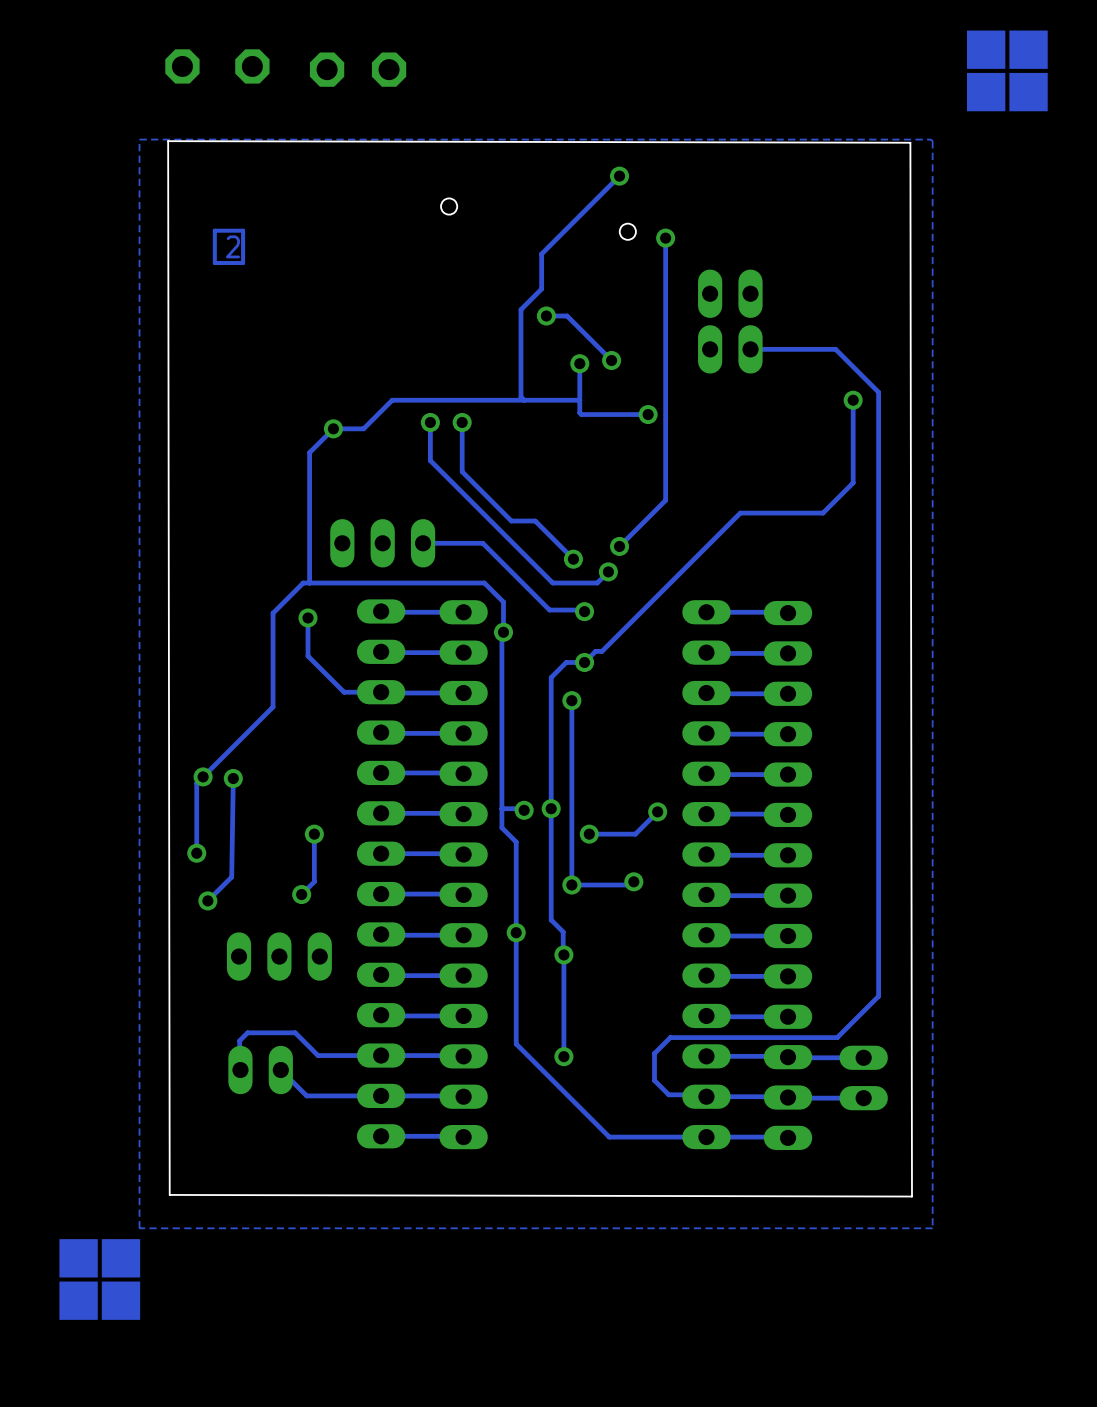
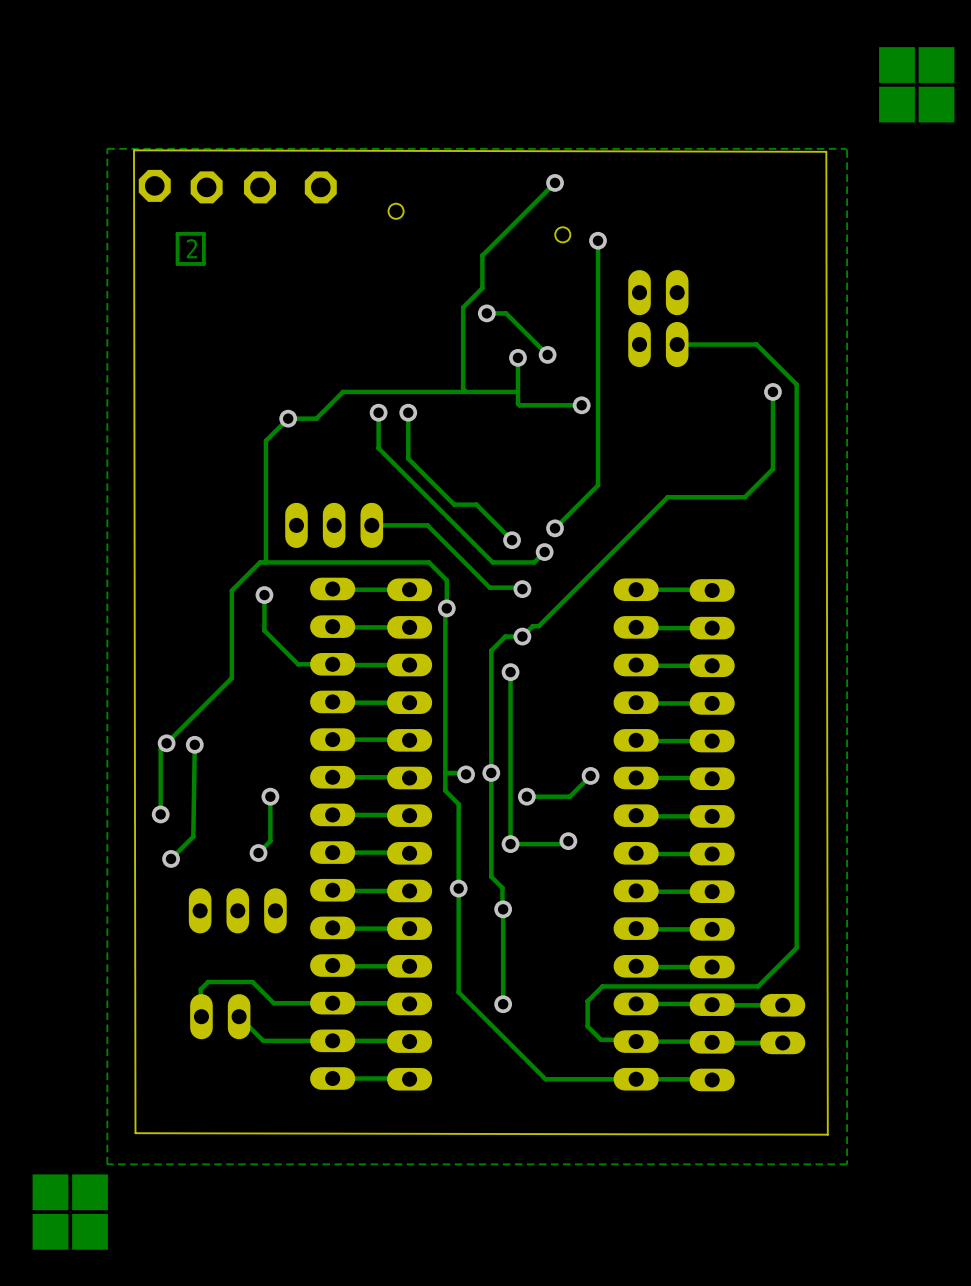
part: (182, 66) -> none
part: (252, 66) -> none
part: (327, 69) -> none
part: (389, 69) -> none
part: none -> (154, 185)
part: none -> (206, 187)
part: none -> (260, 187)
part: none -> (320, 187)

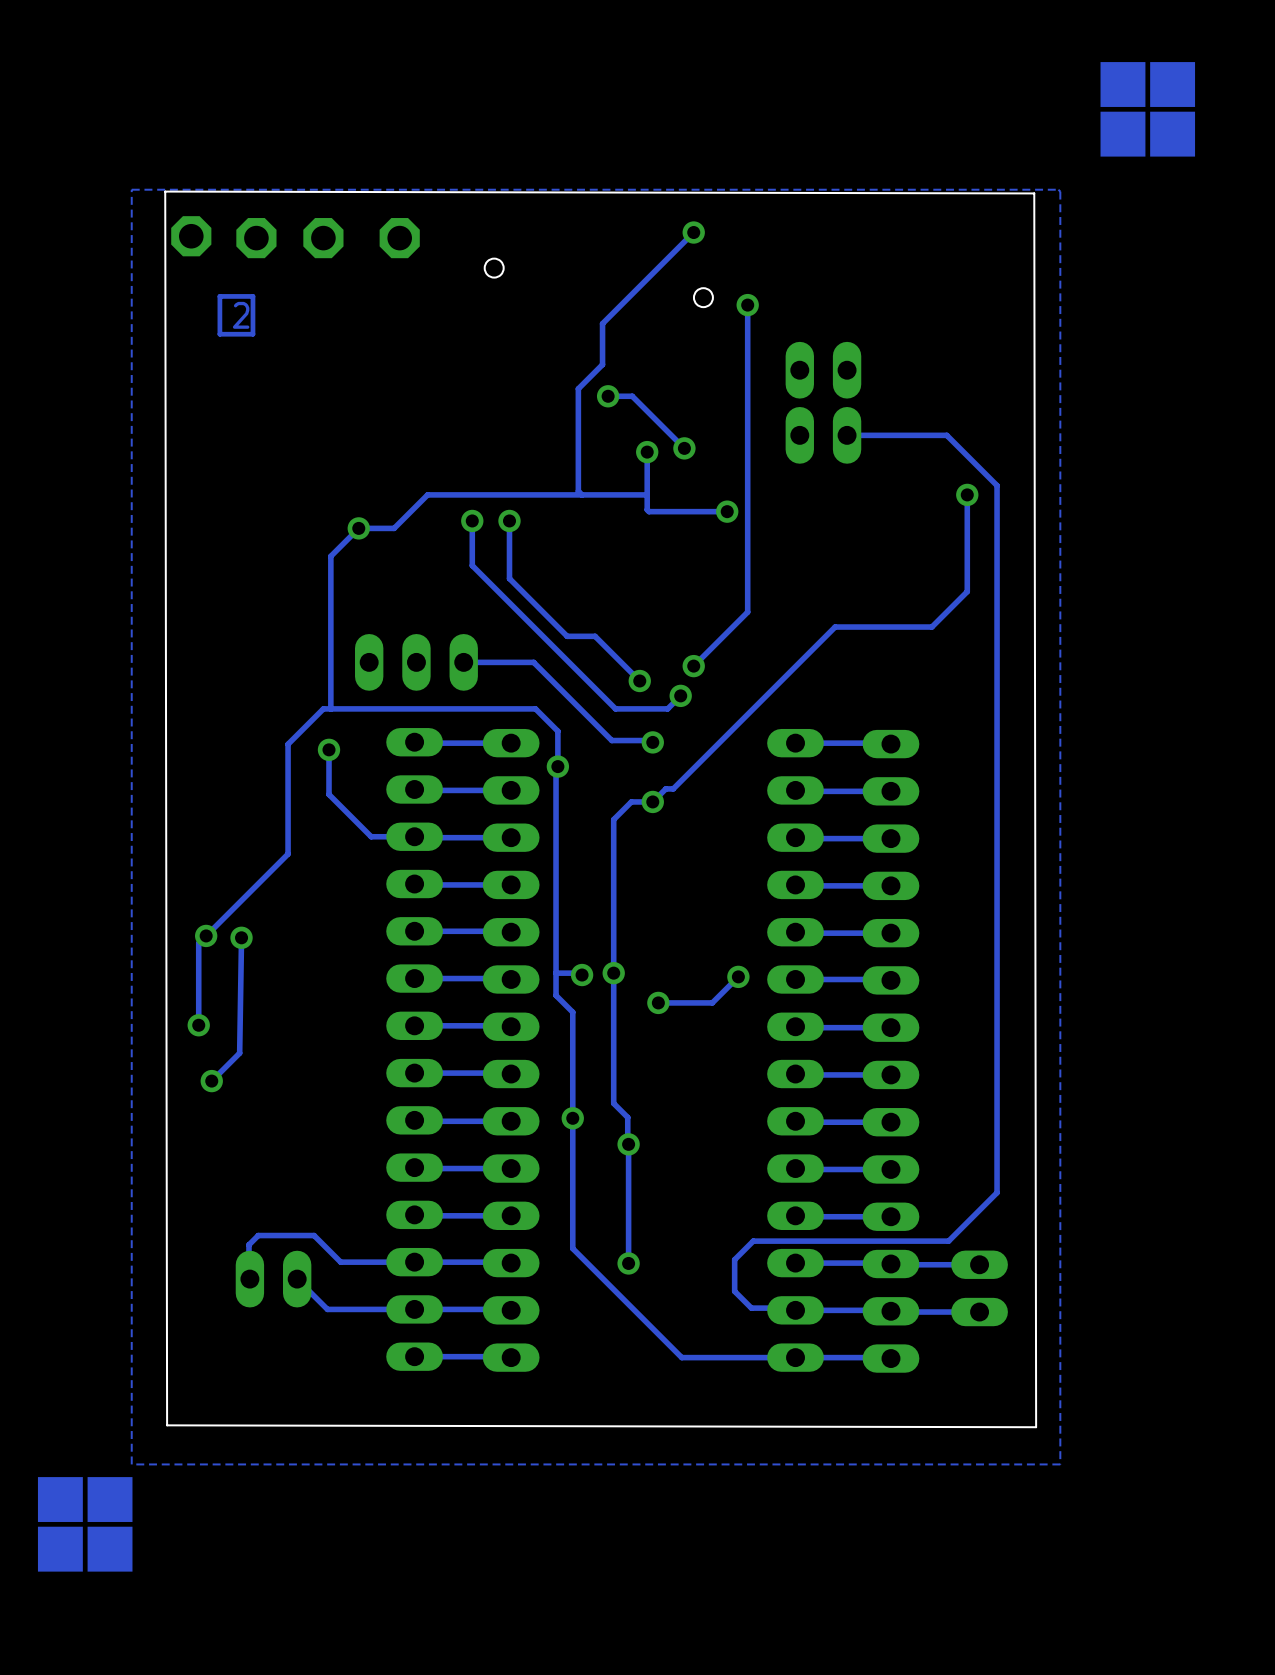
track: (510, 672) (510, 844) (565, 844) (568, 841) -> none
via: (510, 672) -> none
track: (270, 796) (270, 841) (258, 853) -> none
via: (270, 796) -> none
via: (568, 841) -> none
via: (510, 844) -> none
via: (258, 853) -> none
part: (237, 910) -> none

